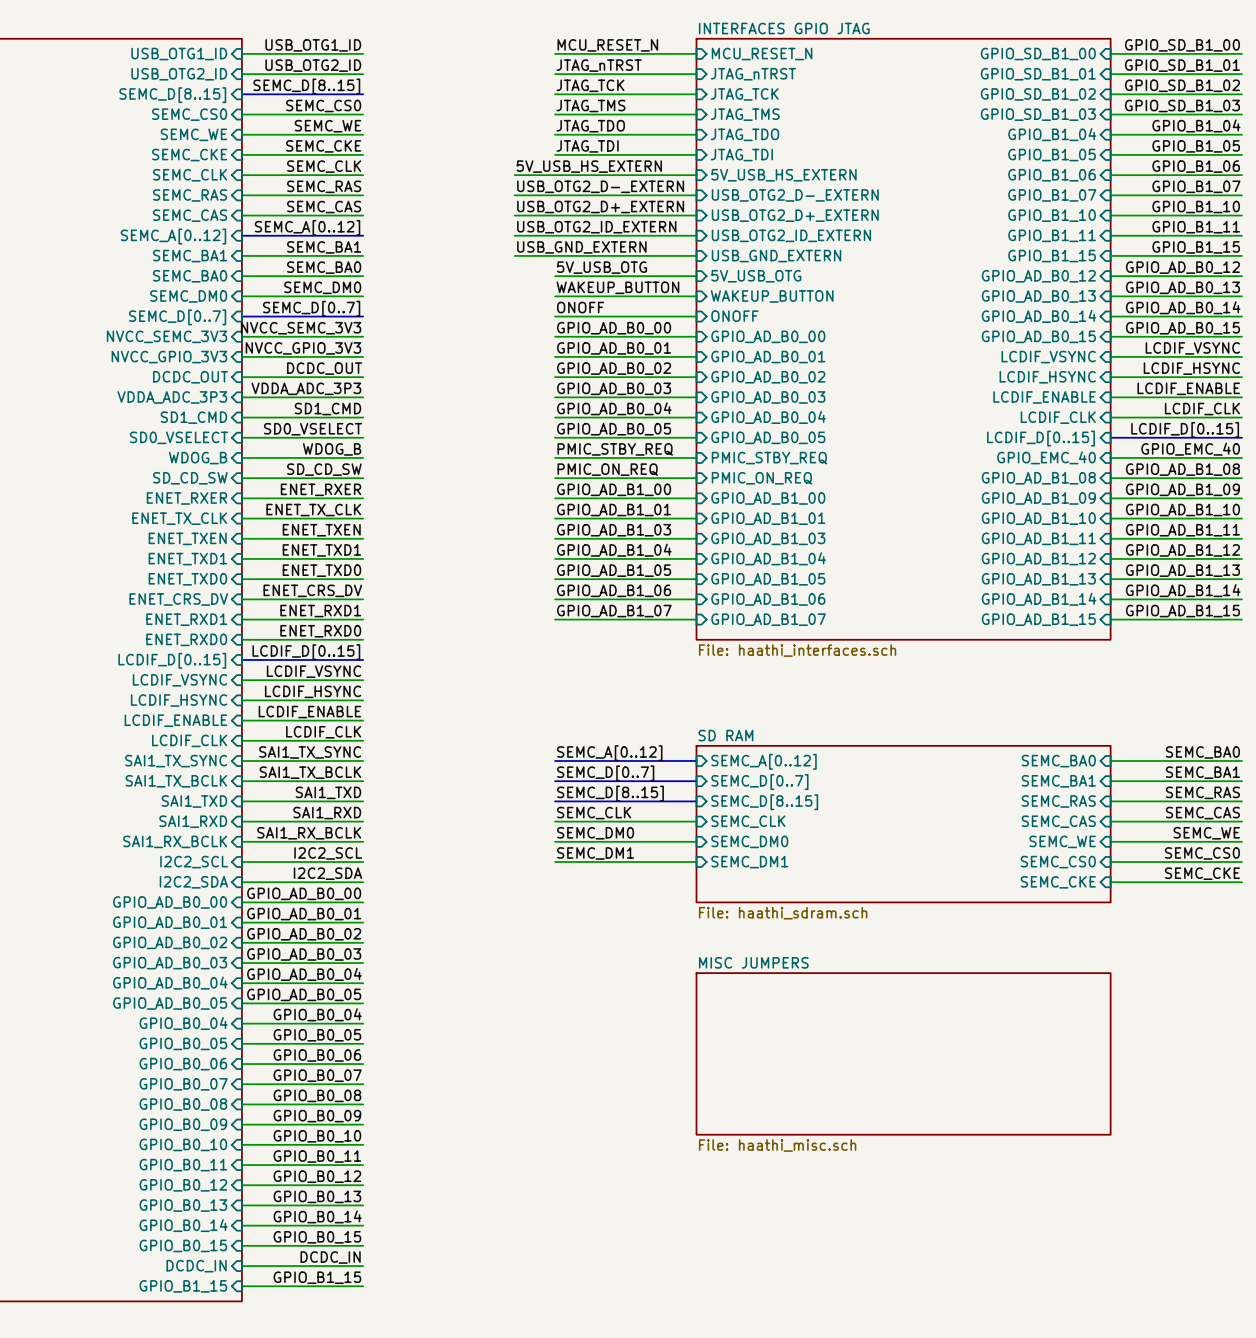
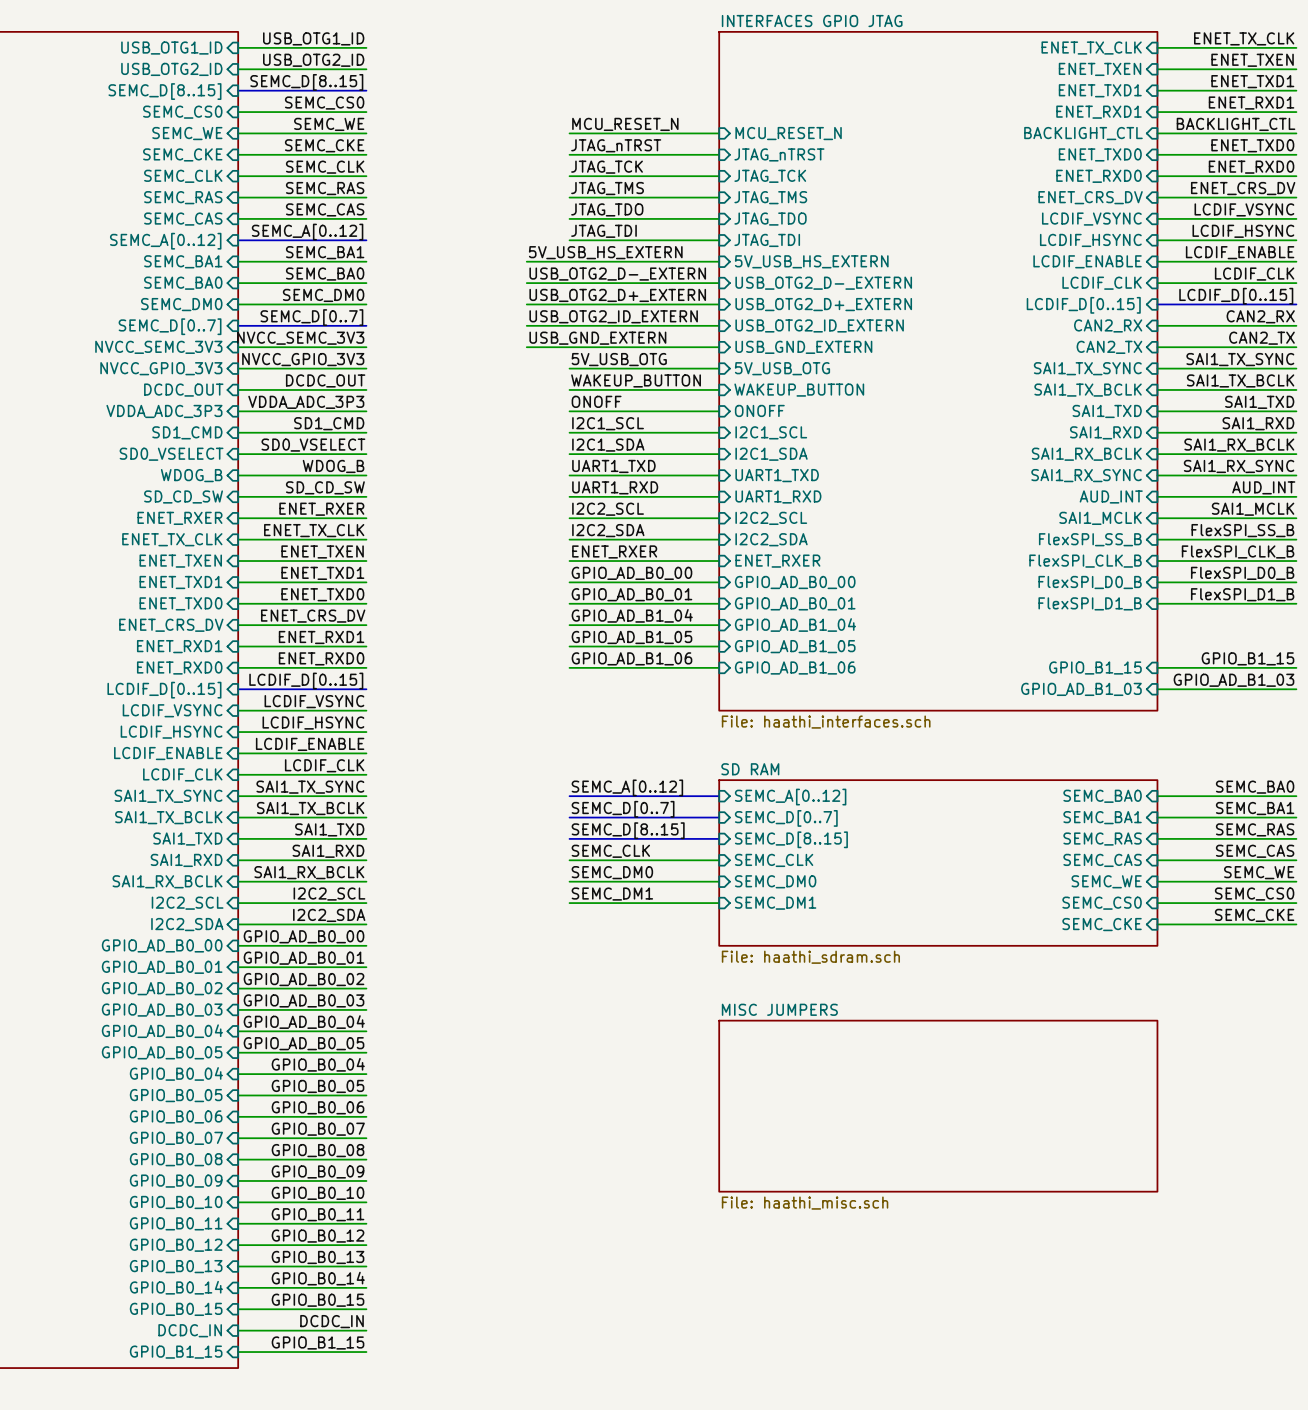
label: MCU_RESET_N (607, 45) -> none
label: GPIO_SD_B1_00 (1182, 45) -> ENET_TX_CLK (1244, 38)
wire: (555, 53) (696, 53) -> none
sheet pin: MCU_RESET_N (762, 54) -> none
sheet pin: GPIO_SD_B1_00 (1038, 54) -> ENET_TX_CLK (1091, 48)
label: JTAG_nTRST (599, 65) -> none
label: GPIO_SD_B1_01 (1182, 65) -> ENET_TXEN (1252, 60)
wire: (555, 74) (696, 74) -> none
sheet pin: JTAG_nTRST (753, 74) -> none
sheet pin: GPIO_SD_B1_01 (1038, 74) -> ENET_TXEN (1100, 69)
label position: JTAG_TCK (590, 85) -> JTAG_TCK (607, 167)
label: GPIO_SD_B1_02 (1182, 85) -> ENET_TXD1 (1252, 81)
wire: (555, 94) (696, 94) -> none
sheet pin: JTAG_TCK (744, 94) -> none
sheet pin: GPIO_SD_B1_02 (1038, 94) -> ENET_TXD1 (1100, 90)
label position: JTAG_TMS (590, 106) -> JTAG_TMS (607, 188)
label: GPIO_SD_B1_03 (1182, 106) -> ENET_RXD1 (1251, 103)
wire: (555, 114) (696, 114) -> none
sheet pin: JTAG_TMS (745, 114) -> none
sheet pin: GPIO_SD_B1_03 (1038, 114) -> ENET_RXD1 (1099, 112)
label: GPIO_B1_04 (1196, 125) -> BACKLIGHT_CTL (1236, 124)
label: JTAG_TDO (590, 126) -> MCU_RESET_N (625, 124)
sheet pin: JTAG_TDO (745, 134) -> MCU_RESET_N (788, 133)
sheet pin: GPIO_B1_04 (1052, 134) -> BACKLIGHT_CTL (1083, 133)
label: JTAG_TDI (587, 146) -> JTAG_nTRST (616, 145)
label: GPIO_B1_05 (1196, 146) -> ENET_TXD0 (1252, 145)
sheet pin: JTAG_TDI (741, 155) -> JTAG_nTRST (779, 154)
sheet pin: GPIO_B1_05 (1052, 155) -> ENET_TXD0 (1100, 154)
label: 5V_USB_HS_EXTERN (589, 166) -> none
label: GPIO_B1_06 (1196, 166) -> ENET_RXD0 (1251, 167)
wire: (514, 175) (555, 175) -> (526, 283) (569, 283)
sheet pin: 5V_USB_HS_EXTERN (783, 175) -> JTAG_TCK (770, 176)
sheet pin: GPIO_B1_06 (1052, 175) -> ENET_RXD0 (1099, 176)
label position: USB_OTG2_D-_EXTERN (600, 186) -> USB_OTG2_D-_EXTERN (617, 274)
label: GPIO_B1_07 (1196, 186) -> ENET_CRS_DV (1243, 188)
wire: (514, 195) (555, 195) -> (526, 304) (569, 304)
sheet pin: USB_OTG2_D-_EXTERN (795, 195) -> JTAG_TMS (770, 197)
sheet pin: GPIO_B1_07 (1052, 195) -> ENET_CRS_DV (1090, 197)
label: none -> JTAG_TDO (607, 209)
label position: USB_OTG2_D+_EXTERN (600, 207) -> USB_OTG2_D+_EXTERN (617, 295)
label: GPIO_B1_10 (1196, 207) -> LCDIF_VSYNC (1244, 209)
wire: (514, 215) (555, 215) -> (526, 325) (569, 325)
sheet pin: USB_OTG2_D+_EXTERN (795, 215) -> JTAG_TDO (770, 219)
sheet pin: GPIO_B1_10 (1052, 215) -> LCDIF_VSYNC (1091, 219)
label: none -> JTAG_TDI (603, 231)
label position: USB_OTG2_ID_EXTERN (596, 227) -> USB_OTG2_ID_EXTERN (613, 316)
label: GPIO_B1_11 (1196, 227) -> LCDIF_HSYNC (1243, 231)
wire: (514, 235) (555, 235) -> (526, 347) (569, 347)
sheet pin: USB_OTG2_ID_EXTERN (791, 235) -> JTAG_TDI (767, 240)
sheet pin: GPIO_B1_11 (1052, 235) -> LCDIF_HSYNC (1090, 240)
label: USB_GND_EXTERN (581, 247) -> 5V_USB_HS_EXTERN (605, 252)
label: GPIO_B1_15 (1196, 247) -> LCDIF_ENABLE (1240, 252)
sheet pin: USB_GND_EXTERN (776, 256) -> 5V_USB_HS_EXTERN (811, 261)
sheet pin: GPIO_B1_15 (1052, 256) -> LCDIF_ENABLE (1087, 261)
label: 5V_USB_OTG (602, 267) -> none
label: GPIO_AD_B0_12 (1182, 267) -> LCDIF_CLK (1254, 274)
sheet pin: 5V_USB_OTG (756, 276) -> USB_OTG2_D-_EXTERN (823, 283)
sheet pin: GPIO_AD_B0_12 (1038, 276) -> LCDIF_CLK (1102, 283)
label: WAKEUP_BUTTON (617, 287) -> none
label: GPIO_AD_B0_13 (1182, 287) -> LCDIF_D[0..15] (1236, 296)
sheet pin: WAKEUP_BUTTON (772, 296) -> USB_OTG2_D+_EXTERN (823, 304)
sheet pin: GPIO_AD_B0_13 (1038, 296) -> LCDIF_D[0..15] (1083, 305)
label: ONOFF (580, 307) -> none
label: GPIO_AD_B0_14 (1183, 307) -> CAN2_RX (1260, 316)
sheet pin: ONOFF (734, 316) -> USB_OTG2_ID_EXTERN (819, 325)
sheet pin: GPIO_AD_B0_14 (1039, 316) -> CAN2_RX (1108, 325)
label: none -> USB_GND_EXTERN (597, 338)
label: GPIO_AD_B0_00 (614, 328) -> none
label: GPIO_AD_B0_15 (1182, 328) -> CAN2_TX (1261, 338)
sheet pin: GPIO_AD_B0_00 (768, 336) -> USB_GND_EXTERN (803, 347)
sheet pin: GPIO_AD_B0_15 (1038, 336) -> CAN2_TX (1109, 347)
sheet INTERFACES GPIO JTAG: File: haathi_interfaces.sch (903, 339) -> none
label: GPIO_AD_B0_01 (614, 348) -> 5V_USB_OTG (619, 359)
label: LCDIF_VSYNC (1192, 348) -> SAI1_TX_SYNC (1240, 359)
sheet pin: GPIO_AD_B0_01 (768, 357) -> 5V_USB_OTG (782, 368)
sheet pin: LCDIF_VSYNC (1048, 357) -> SAI1_TX_SYNC (1087, 368)
sheet INTERFACES GPIO JTAG: none -> File: haathi_interfaces.sch (938, 371)
label: GPIO_AD_B0_02 (614, 368) -> WAKEUP_BUTTON (636, 380)
label: LCDIF_HSYNC (1191, 368) -> SAI1_TX_BCLK (1240, 380)
sheet pin: GPIO_AD_B0_02 (768, 377) -> WAKEUP_BUTTON (799, 390)
sheet pin: LCDIF_HSYNC (1047, 377) -> SAI1_TX_BCLK (1088, 390)
label: GPIO_AD_B0_03 (614, 388) -> ONOFF (596, 401)
label: LCDIF_ENABLE (1188, 388) -> SAI1_TXD (1259, 402)
sheet pin: GPIO_AD_B0_03 (768, 397) -> ONOFF (759, 410)
sheet pin: LCDIF_ENABLE (1044, 397) -> SAI1_TXD (1107, 411)
label: GPIO_AD_B0_04 (614, 408) -> I2C1_SCL (608, 423)
label: LCDIF_CLK (1202, 409) -> SAI1_RXD (1258, 423)
sheet pin: GPIO_AD_B0_04 (768, 417) -> I2C1_SCL (771, 432)
sheet pin: LCDIF_CLK (1058, 417) -> SAI1_RXD (1105, 432)
label: GPIO_AD_B0_05 (614, 429) -> I2C1_SDA (608, 445)
label: LCDIF_D[0..15] (1185, 429) -> SAI1_RX_BCLK (1239, 445)
sheet pin: GPIO_AD_B0_05 (768, 437) -> I2C1_SDA (771, 454)
bus: (1110, 437) (1241, 437) -> (1157, 304) (1296, 304)
sheet pin: LCDIF_D[0..15] (1040, 438) -> SAI1_RX_BCLK (1086, 454)
label: PMIC_STBY_REQ (615, 449) -> UART1_TXD (613, 466)
label: GPIO_EMC_40 (1190, 449) -> SAI1_RX_SYNC (1239, 466)
sheet pin: GPIO_EMC_40 (1046, 457) -> SAI1_RX_SYNC (1086, 475)
sheet pin: PMIC_STBY_REQ (769, 458) -> UART1_TXD (777, 475)
label: PMIC_ON_REQ (607, 469) -> UART1_RXD (615, 487)
label: GPIO_AD_B1_08 (1182, 469) -> AUD_INT (1263, 487)
sheet pin: PMIC_ON_REQ (762, 478) -> UART1_RXD (778, 496)
sheet pin: GPIO_AD_B1_08 (1038, 478) -> AUD_INT (1111, 496)
label: GPIO_AD_B1_00 (614, 489) -> I2C2_SCL (608, 509)
label: GPIO_AD_B1_09 (1182, 489) -> SAI1_MCLK (1253, 509)
sheet pin: GPIO_AD_B1_00 (768, 498) -> I2C2_SCL (771, 518)
sheet pin: GPIO_AD_B1_09 (1038, 498) -> SAI1_MCLK (1100, 518)
label: GPIO_AD_B1_01 (614, 510) -> I2C2_SDA (608, 530)
label: GPIO_AD_B1_10 (1182, 510) -> FlexSPI_SS_B (1242, 530)
sheet pin: GPIO_AD_B1_01 (768, 518) -> I2C2_SDA (771, 539)
sheet pin: GPIO_AD_B1_10 (1038, 518) -> FlexSPI_SS_B (1090, 539)
label: GPIO_AD_B1_03 (614, 530) -> ENET_RXER (614, 551)
label: GPIO_AD_B1_11 (1182, 530) -> FlexSPI_CLK_B (1238, 551)
sheet pin: GPIO_AD_B1_03 (768, 538) -> ENET_RXER (777, 561)
sheet pin: GPIO_AD_B1_11 (1038, 538) -> FlexSPI_CLK_B (1085, 561)
label: GPIO_AD_B1_04 (614, 550) -> GPIO_AD_B0_00 (631, 573)
label: GPIO_AD_B1_12 (1182, 550) -> FlexSPI_D0_B (1242, 573)
sheet pin: GPIO_AD_B1_04 (768, 558) -> GPIO_AD_B0_00 (795, 582)
sheet pin: GPIO_AD_B1_12 (1038, 559) -> FlexSPI_D0_B (1090, 582)
label: GPIO_AD_B1_05 (614, 570) -> GPIO_AD_B0_01 (631, 594)
label: GPIO_AD_B1_13 (1182, 570) -> FlexSPI_D1_B (1242, 594)
sheet pin: GPIO_AD_B1_05 (768, 579) -> GPIO_AD_B0_01 (795, 603)
sheet pin: GPIO_AD_B1_13 (1038, 579) -> FlexSPI_D1_B (1090, 603)
label: GPIO_AD_B1_06 (614, 590) -> GPIO_AD_B1_04 (632, 615)
label: GPIO_AD_B1_14 (1183, 590) -> none
sheet pin: GPIO_AD_B1_06 (768, 599) -> GPIO_AD_B1_04 (795, 625)
sheet pin: GPIO_AD_B1_14 (1039, 599) -> none
wire: (1110, 599) (1241, 599) -> (1157, 667) (1296, 667)
label: GPIO_AD_B1_07 (614, 611) -> GPIO_AD_B1_05 (631, 637)
label: GPIO_AD_B1_15 (1182, 611) -> GPIO_B1_15 (1247, 658)
sheet pin: GPIO_AD_B1_07 (768, 619) -> GPIO_AD_B1_05 (795, 646)
sheet pin: GPIO_AD_B1_15 (1038, 619) -> GPIO_B1_15 (1095, 668)
wire: (1110, 619) (1241, 619) -> (1157, 689) (1296, 689)
label: none -> GPIO_AD_B1_06 (631, 658)
wire: none -> (569, 667) (719, 667)
sheet pin: none -> GPIO_AD_B1_06 (795, 668)
label: none -> GPIO_AD_B1_03 (1233, 680)
sheet pin: none -> GPIO_AD_B1_03 (1081, 689)

